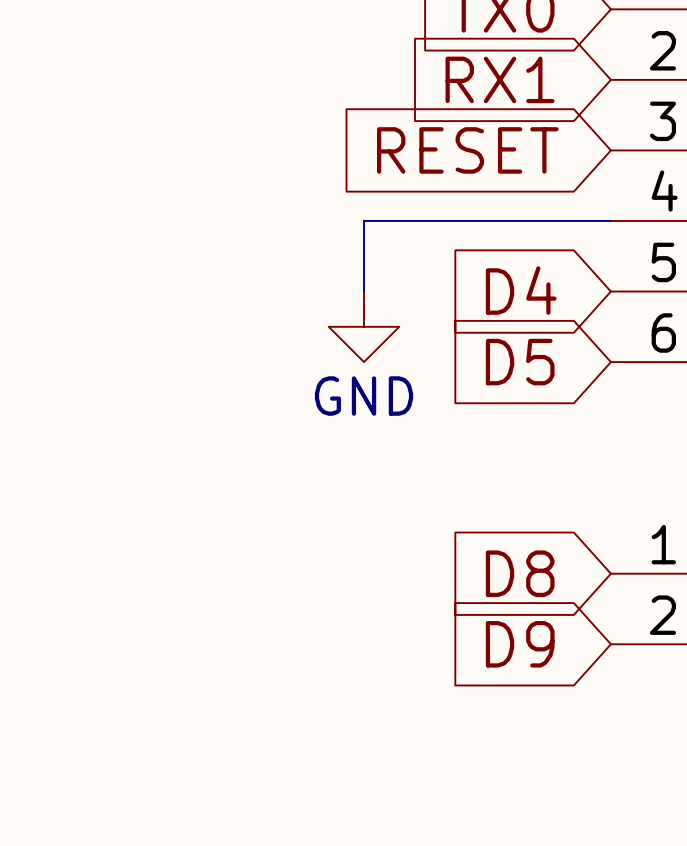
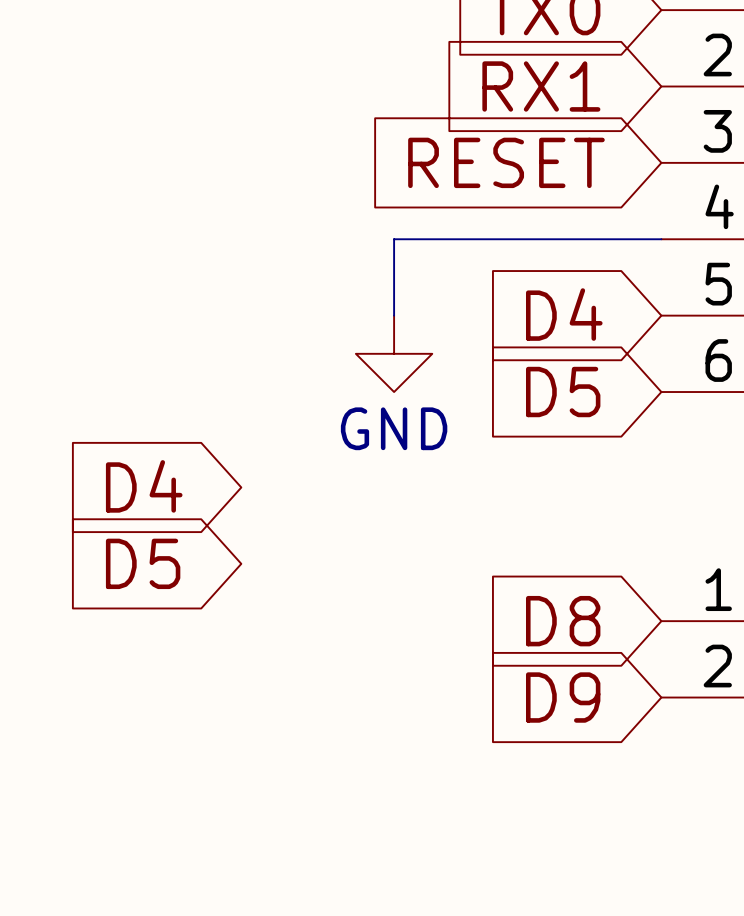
global label: none -> D4 (144, 486)
global label: none -> D5 (143, 563)

